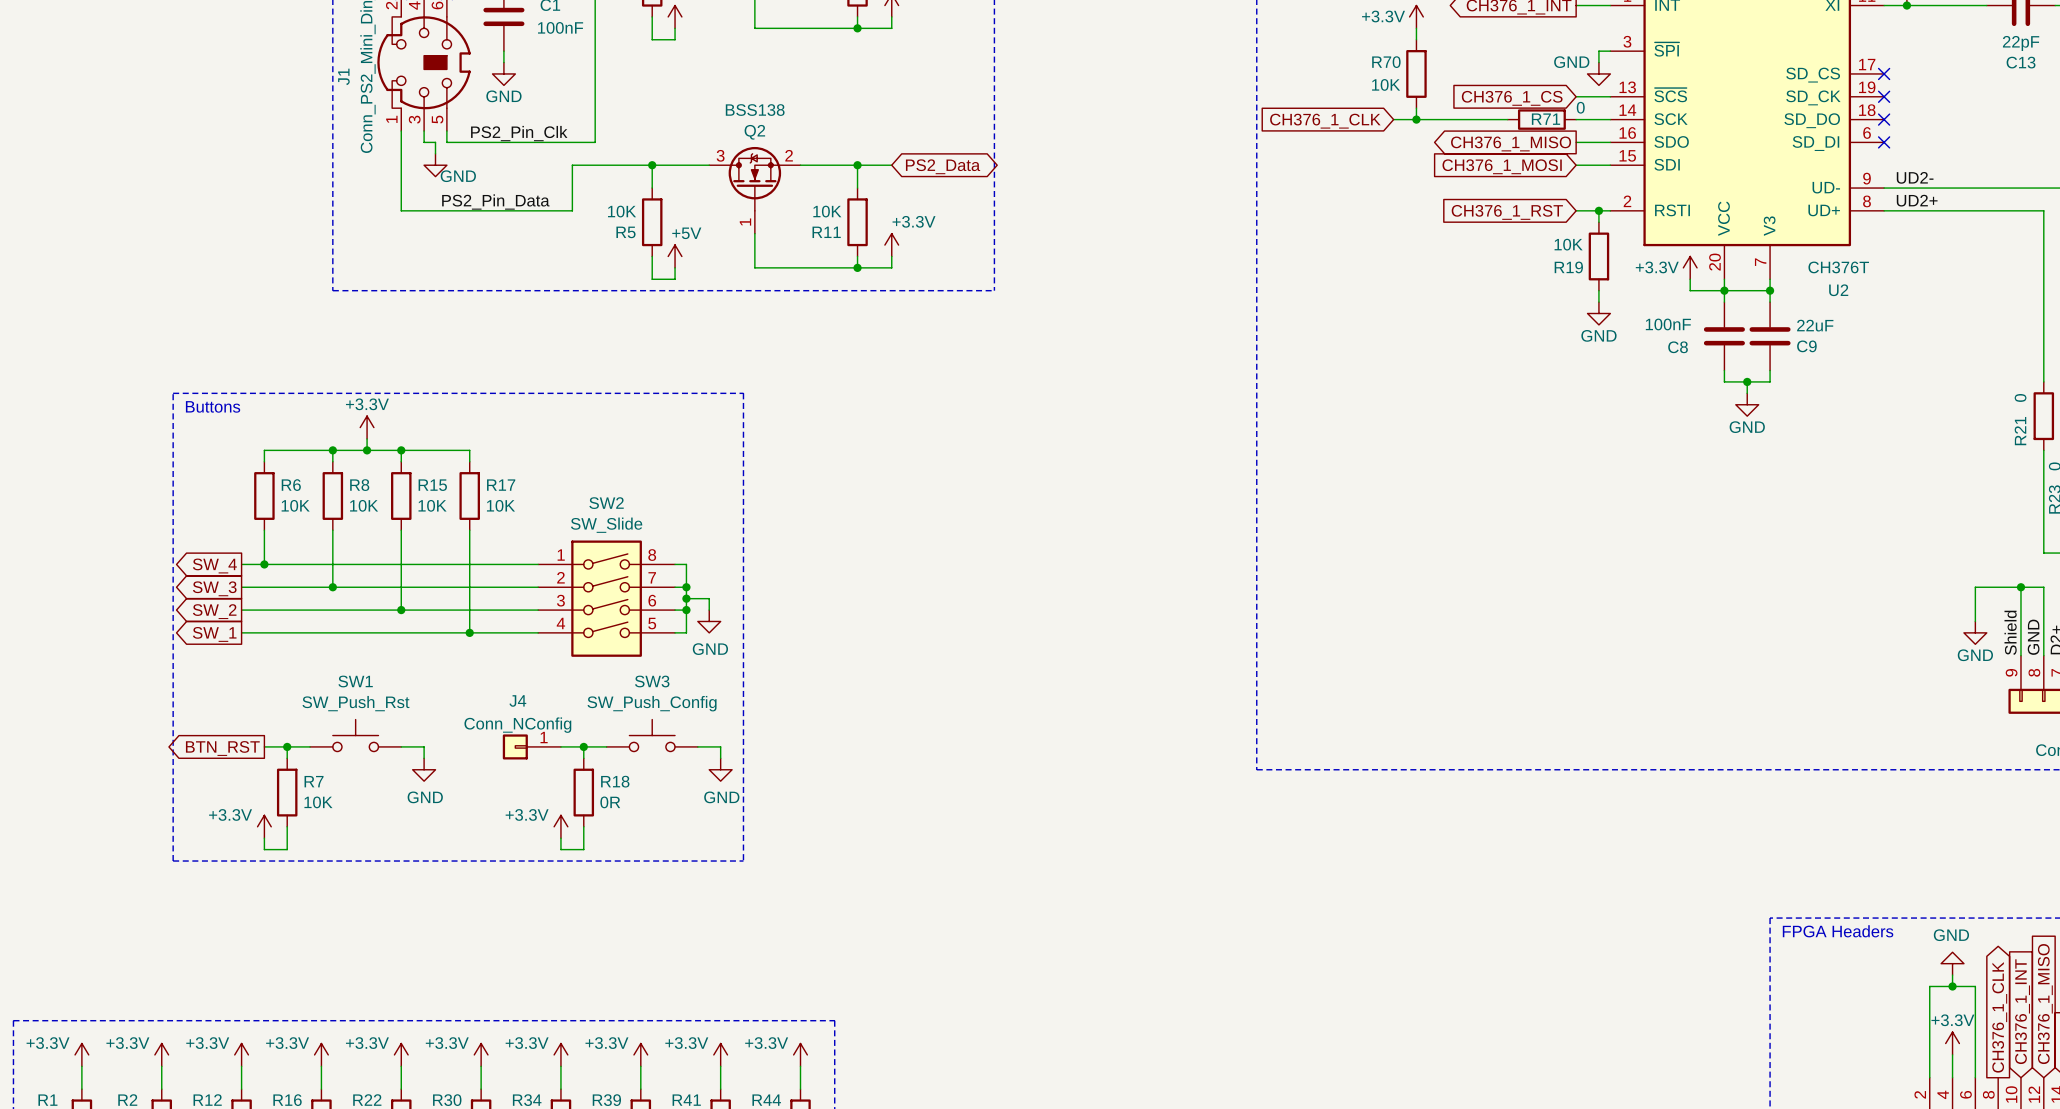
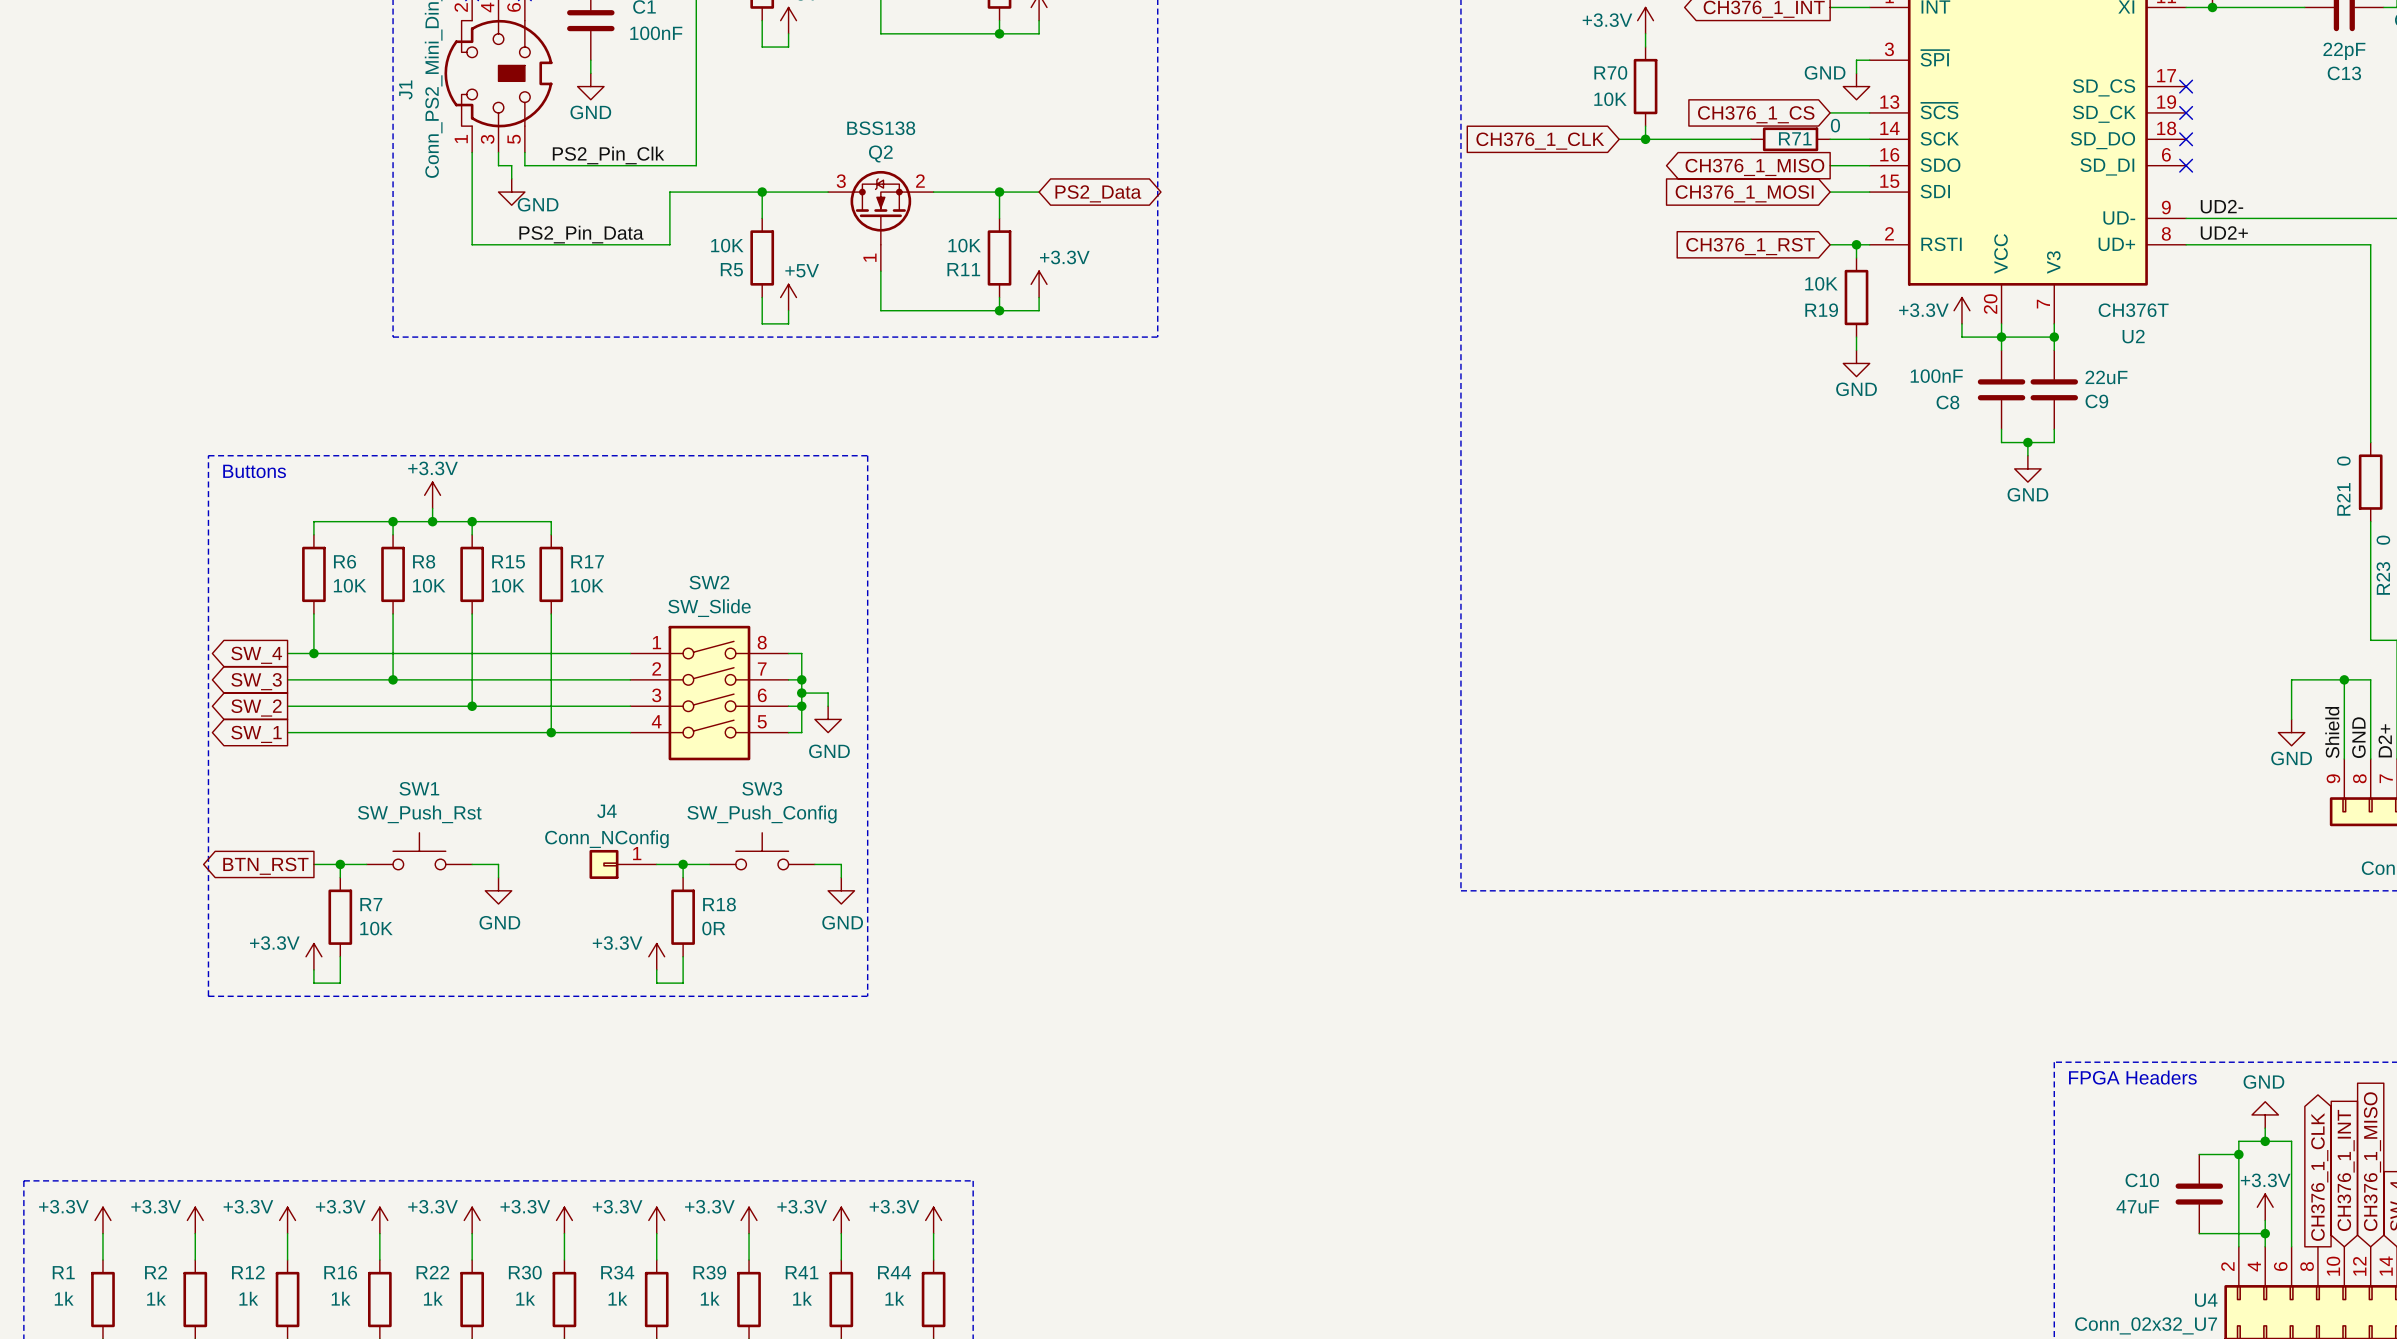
wire: none -> (2199, 1154) (2238, 1154)
junction: none -> (2238, 1154)
C10: none -> 47uF (2199, 1194)
wire: none -> (2199, 1233) (2265, 1233)
junction: none -> (2265, 1233)

